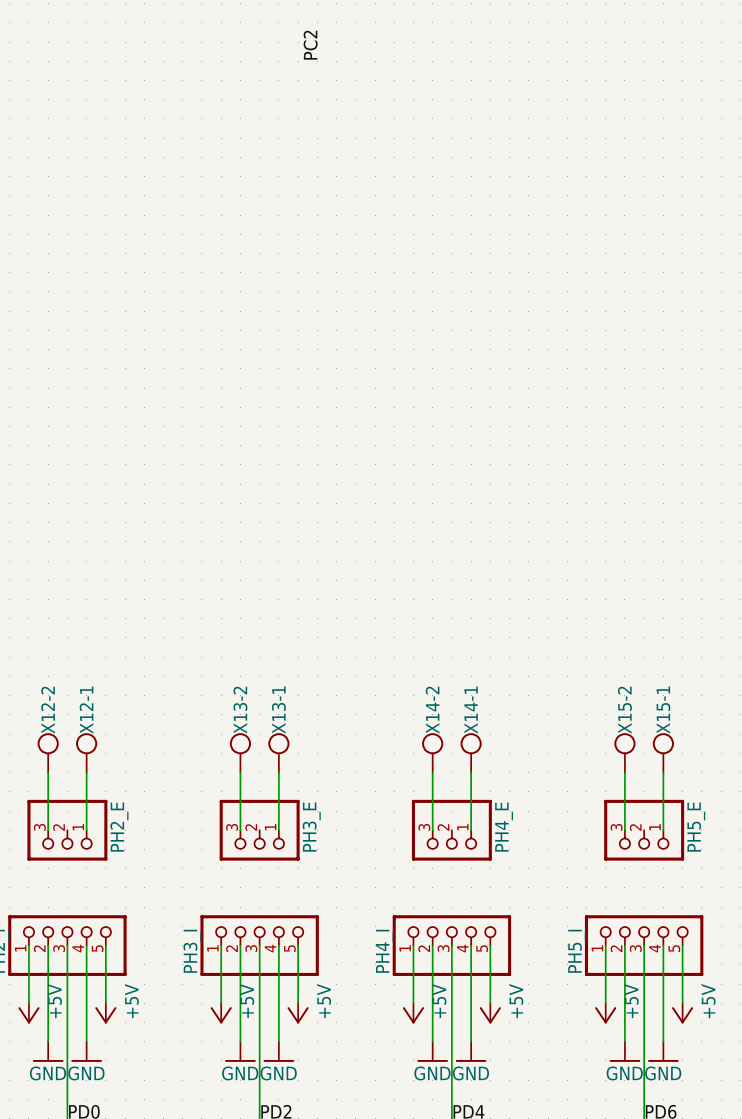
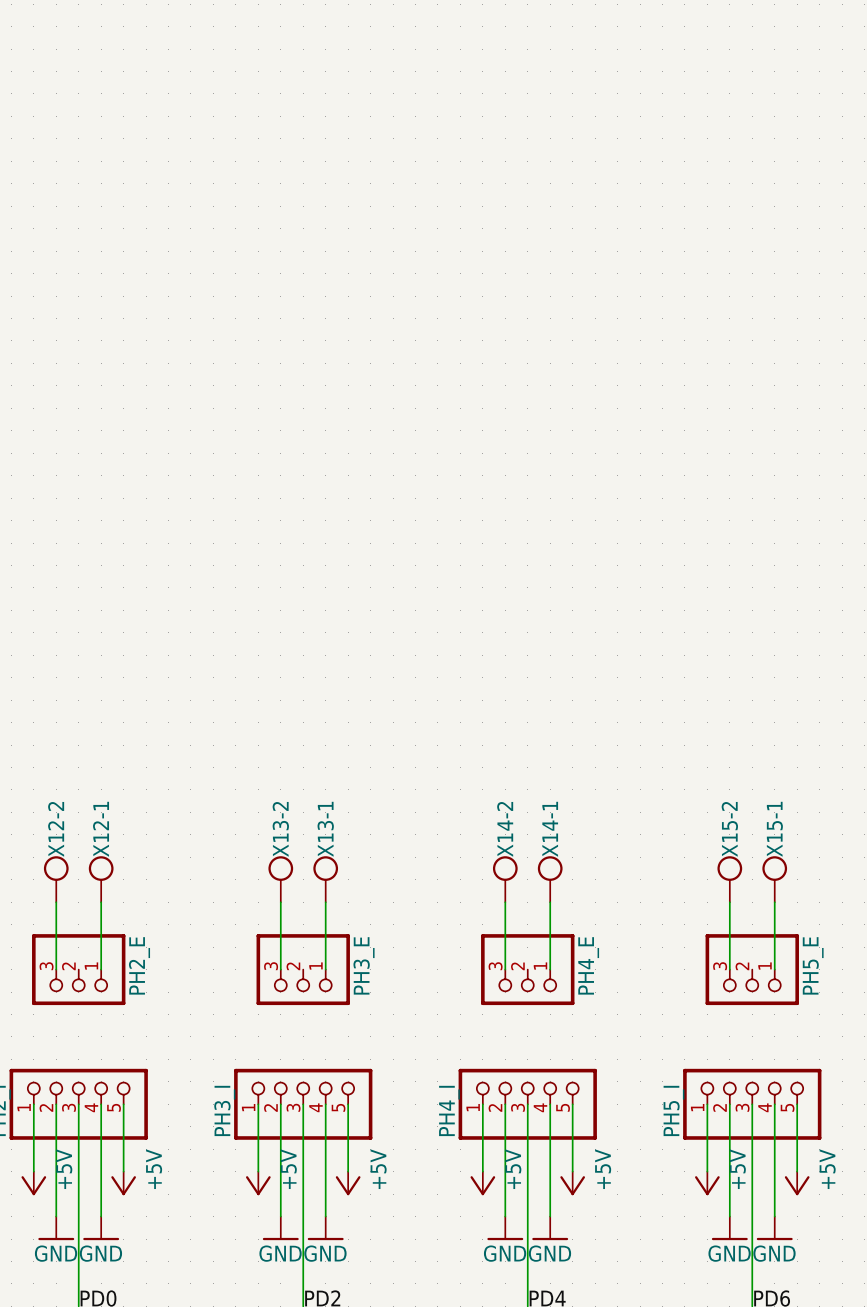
label: PC2 (310, 45) -> none

